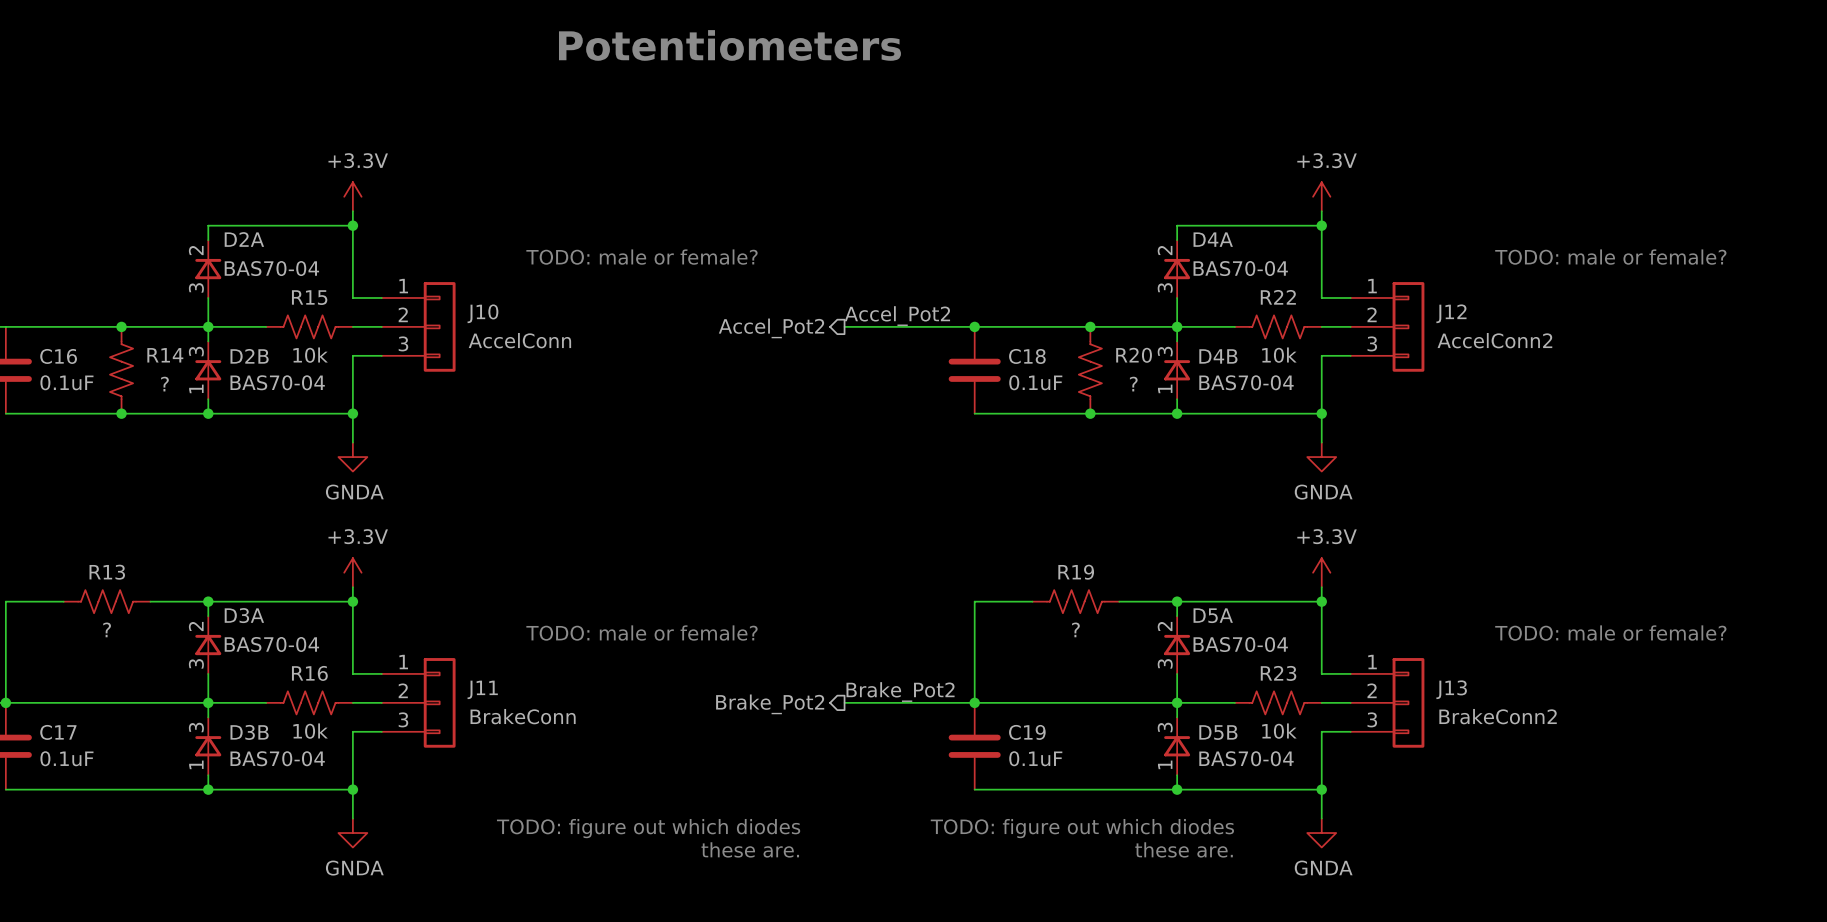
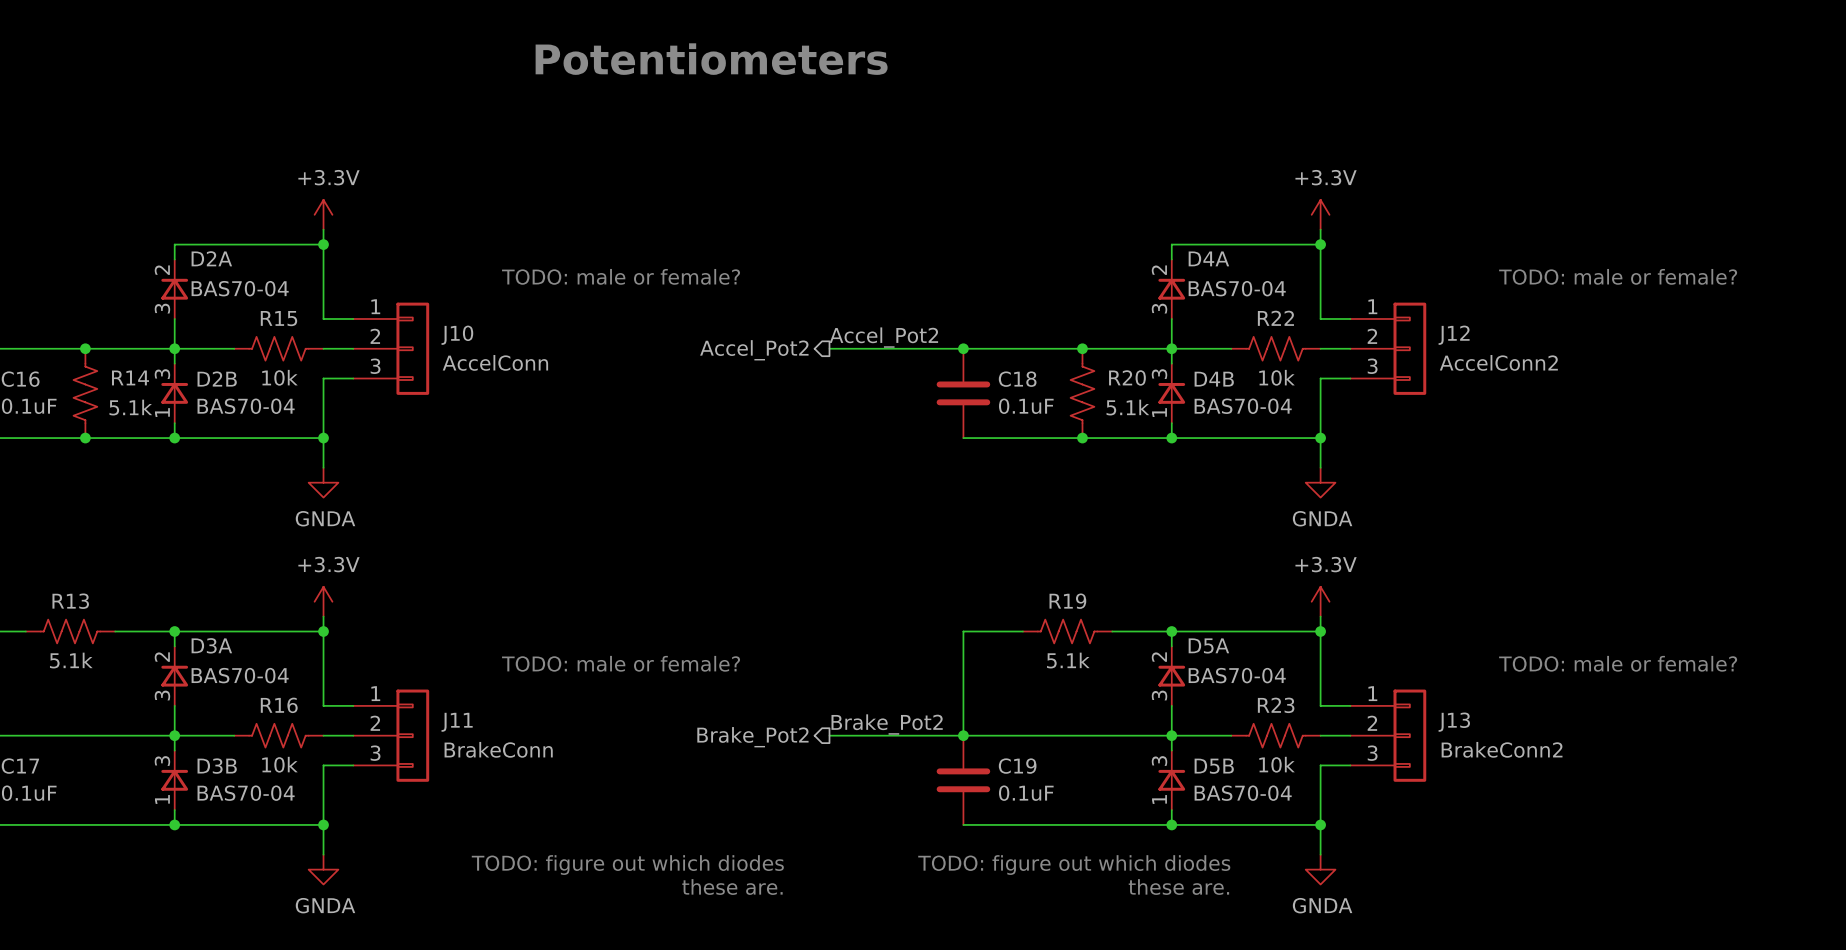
R14 value: ? (164, 384) -> 5.1k (130, 407)
R20 value: ? (1133, 384) -> 5.1k (1127, 407)
R13 value: ? (107, 629) -> 5.1k (71, 660)
R19 value: ? (1075, 629) -> 5.1k (1068, 660)

